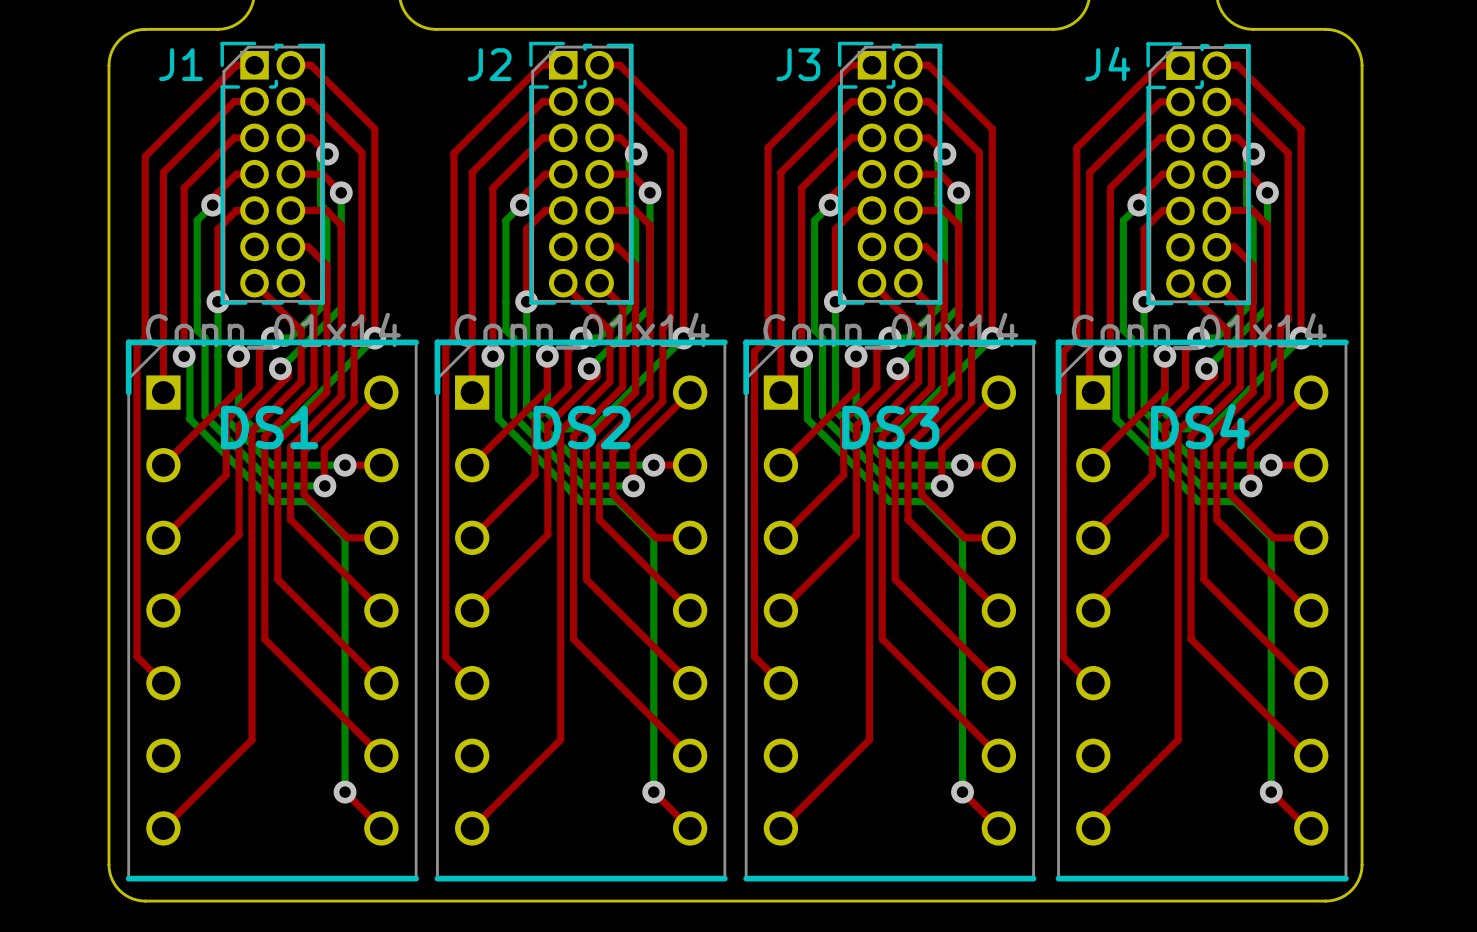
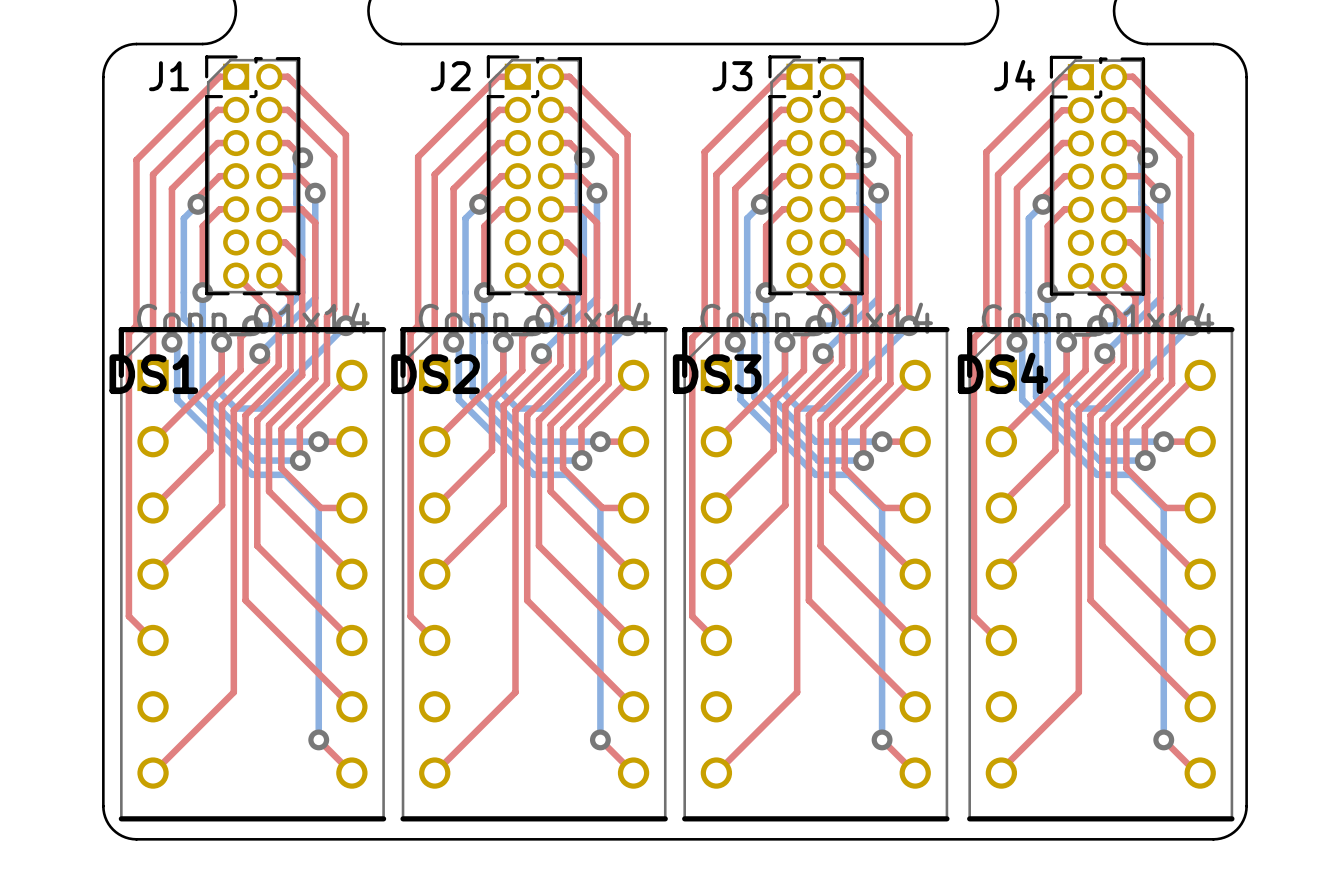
DS4 name position: DS4 (1200, 426) -> DS4 (1002, 373)
DS1 name position: DS1 (269, 427) -> DS1 (153, 374)
DS2 name position: DS2 (582, 427) -> DS2 (435, 374)
DS3 name position: DS3 (890, 427) -> DS3 (717, 374)

